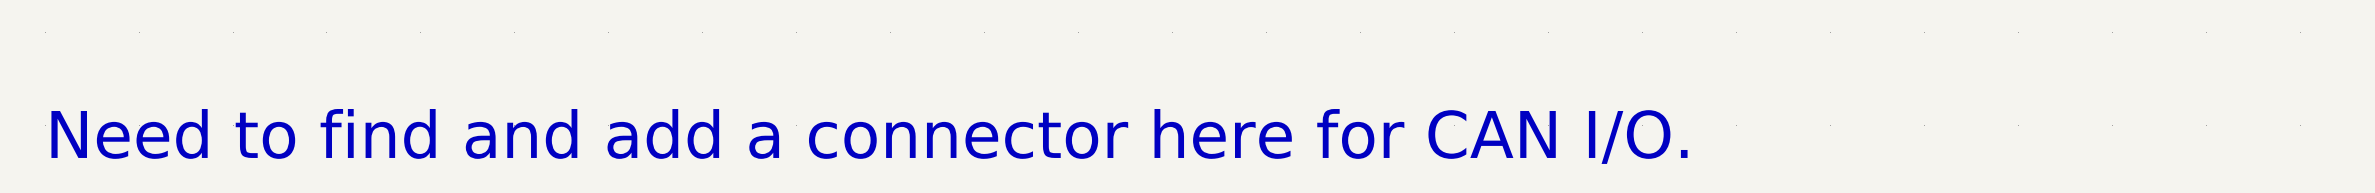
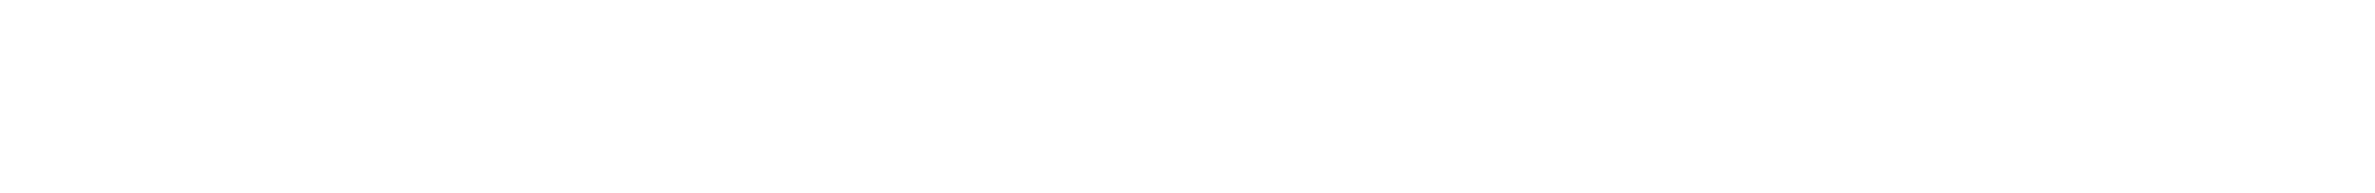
text: Need to find and add a connector here for CAN I/O. (869, 136) -> none

